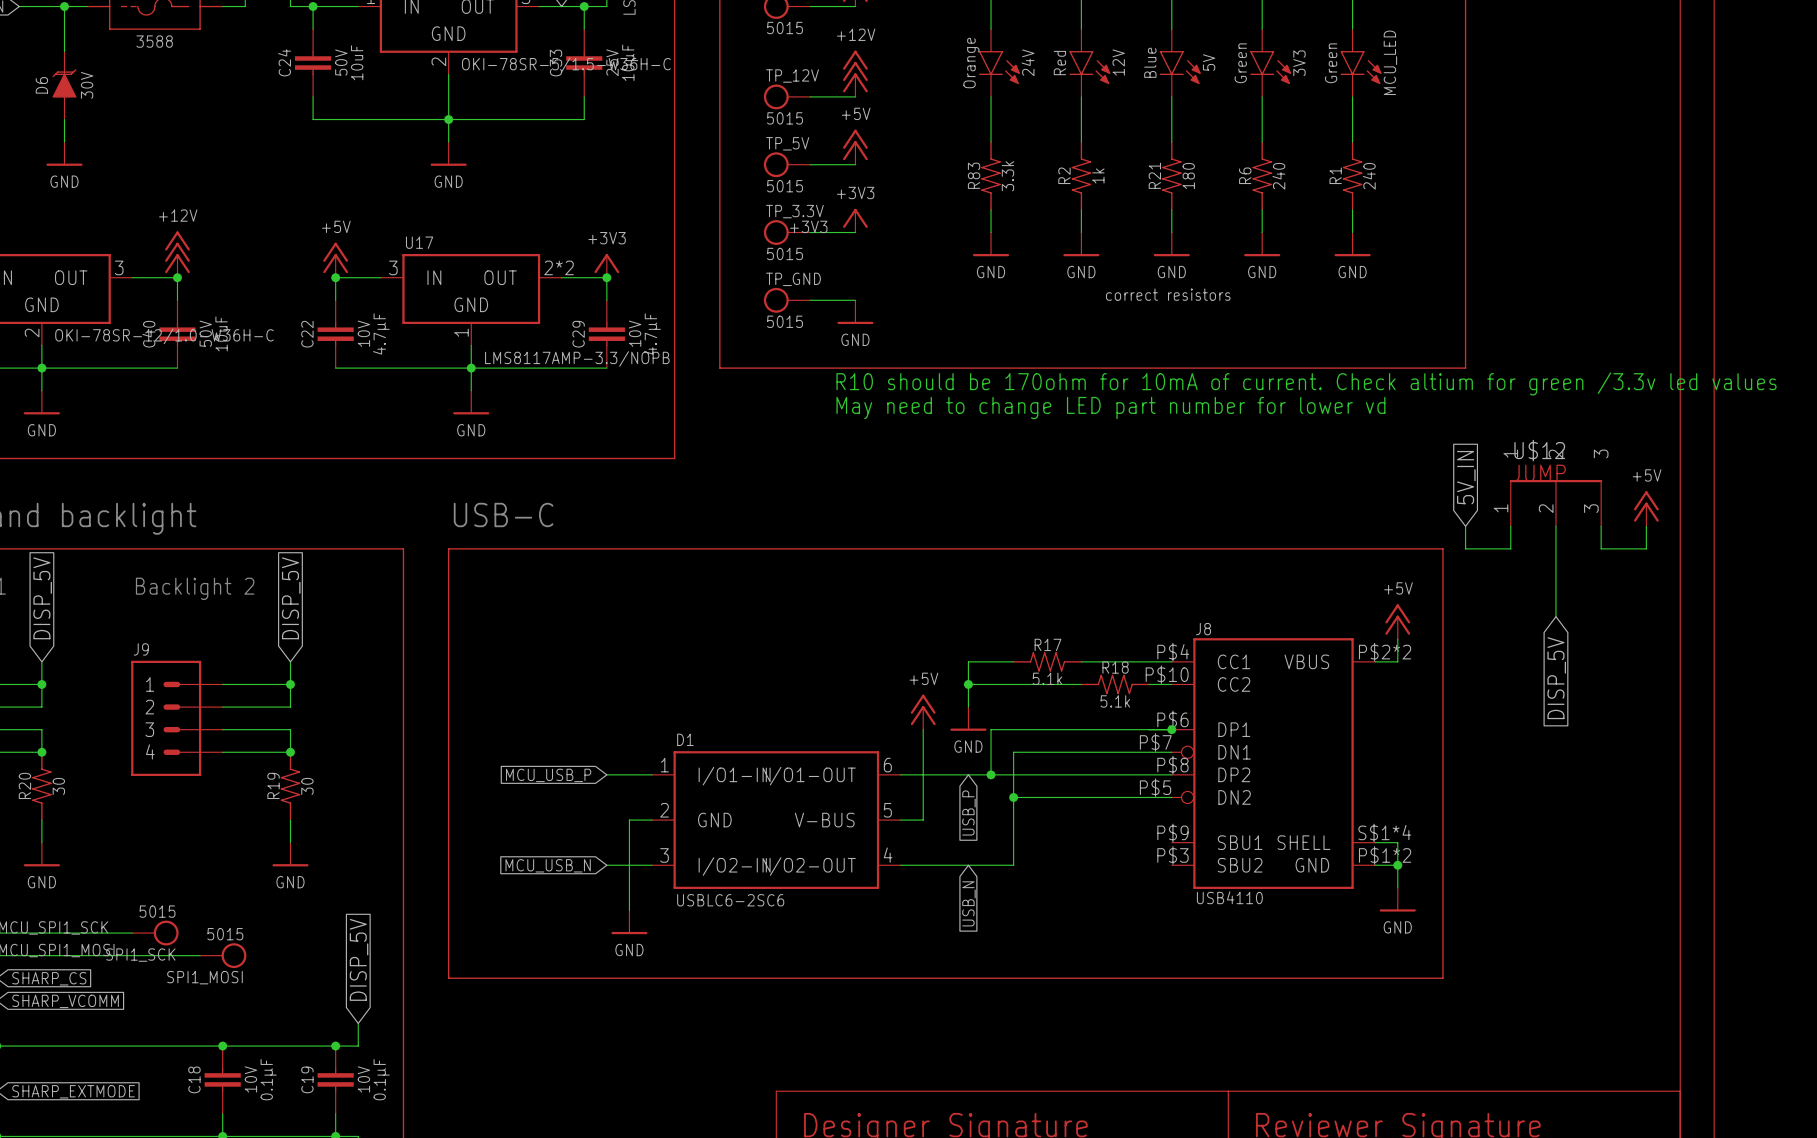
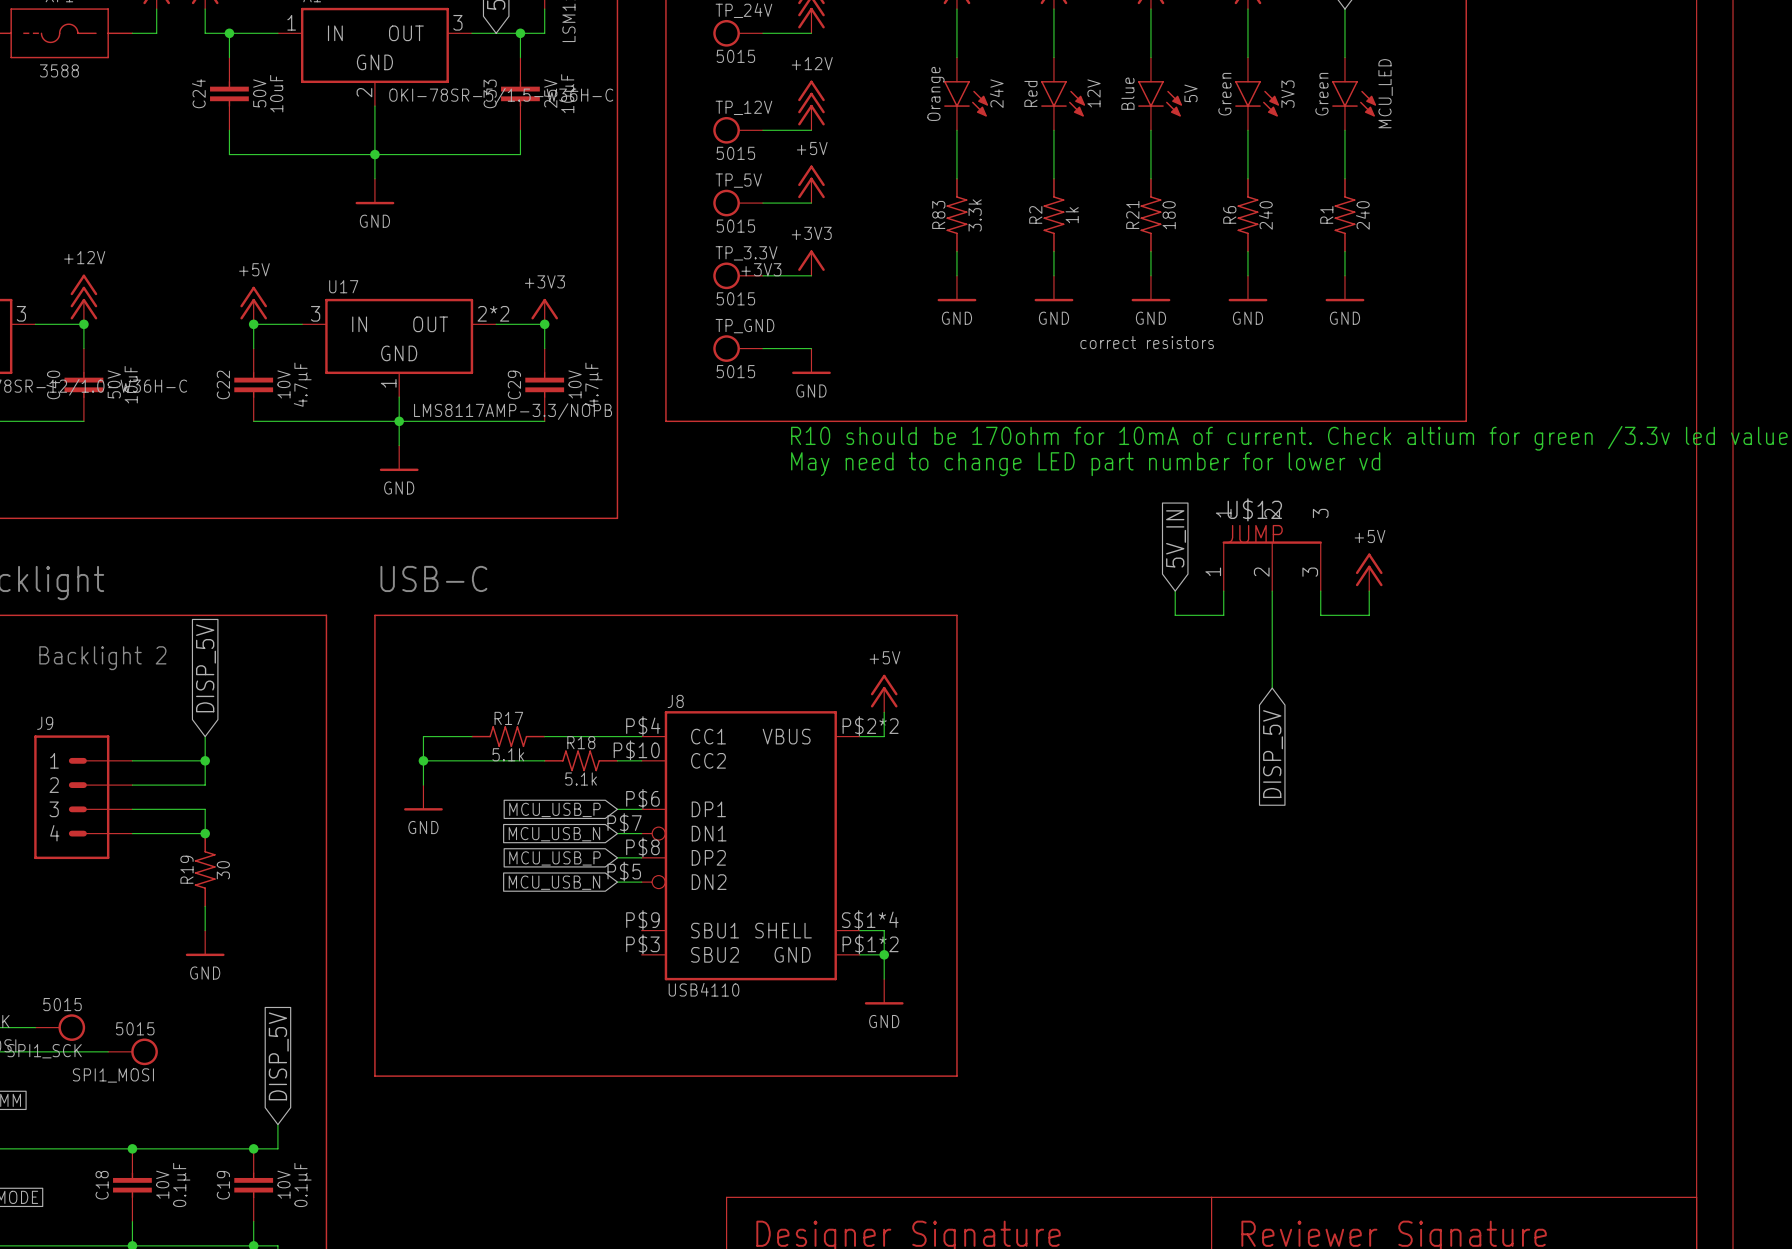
global label: none -> 5V_IN (1176, 538)
global label: 5V_IN (1466, 477) -> none
U$12 position: (1555, 503) -> (1272, 566)
power symbol: +5V (1646, 508) -> none
wire: none -> (1175, 591) (1175, 615) (1223, 615) (1223, 591)
wire: none -> (1272, 591) (1272, 688)
wire: (1465, 526) (1465, 548) (1510, 548) (1510, 526) -> (1320, 591) (1320, 615) (1369, 615) (1369, 591)
wire: (1555, 526) (1555, 616) -> none
wire: (1601, 526) (1601, 548) (1646, 548) (1646, 526) -> none
line: (991, 548) (1442, 548) (1442, 978) (991, 978) -> (956, 615) (956, 1076)
power symbol position: +5V (1397, 621) -> +5V (1369, 572)
wire: none -> (884, 712) (884, 736) (859, 736)
wire: (1397, 639) (1397, 661) (1375, 661) -> none
wire: none -> (471, 736) (423, 736) (423, 785)
wire: none -> (544, 736) (641, 736)
wire: (1013, 661) (968, 661) (968, 707) -> none
R17 position: (1047, 661) -> (508, 736)
wire: (1081, 661) (1171, 661) -> none
global label: none -> DISP_5V (1273, 754)
global label: DISP_5V (1556, 678) -> none
wire: none -> (423, 760) (544, 760)
junction: none -> (423, 760)
wire: none -> (617, 760) (641, 760)
wire: (968, 684) (1081, 684) -> none
junction: (968, 684) -> none
R18 position: (1115, 684) -> (581, 760)
wire: (1149, 684) (1171, 684) -> none
power symbol position: +5V (923, 712) -> +5V (884, 693)
power symbol: none -> GND (423, 797)
power symbol: GND (968, 718) -> none
wire: none -> (617, 809) (641, 809)
wire: (923, 729) (923, 820) (900, 820) -> none
wire: (1171, 729) (991, 729) (991, 774) -> none
junction: (1171, 729) -> none
global label: none -> MCU_USB_P (554, 809)
global label: none -> MCU_USB_N (554, 834)
wire: (1171, 752) (1013, 752) (1013, 865) (923, 865) -> none
J8 position: (1273, 763) -> (750, 845)
wire: (606, 774) (652, 774) -> none
wire: none -> (617, 857) (641, 857)
wire: (900, 774) (1171, 774) -> none
junction: (991, 774) -> none
global label: MCU_USB_P (548, 775) -> none
global label: none -> MCU_USB_P (554, 858)
wire: none -> (617, 882) (641, 882)
wire: (1013, 797) (1171, 797) -> none
junction: (1013, 797) -> none
global label: none -> MCU_USB_N (554, 882)
global label: USB_P (968, 812) -> none
wire: (652, 820) (629, 820) (629, 910) -> none
D1: (776, 820) -> none
wire: none -> (859, 930) (884, 930) (884, 979)
wire: (1375, 842) (1397, 842) (1397, 887) -> none
global label: MCU_USB_N (548, 865) -> none
wire: (606, 865) (652, 865) -> none
junction: none -> (884, 954)
wire: (1375, 865) (1397, 865) -> none
junction: (1397, 865) -> none
power symbol: none -> GND (884, 991)
power symbol: GND (1397, 899) -> none
global label: USB_N (968, 903) -> none
power symbol: GND (629, 922) -> none

